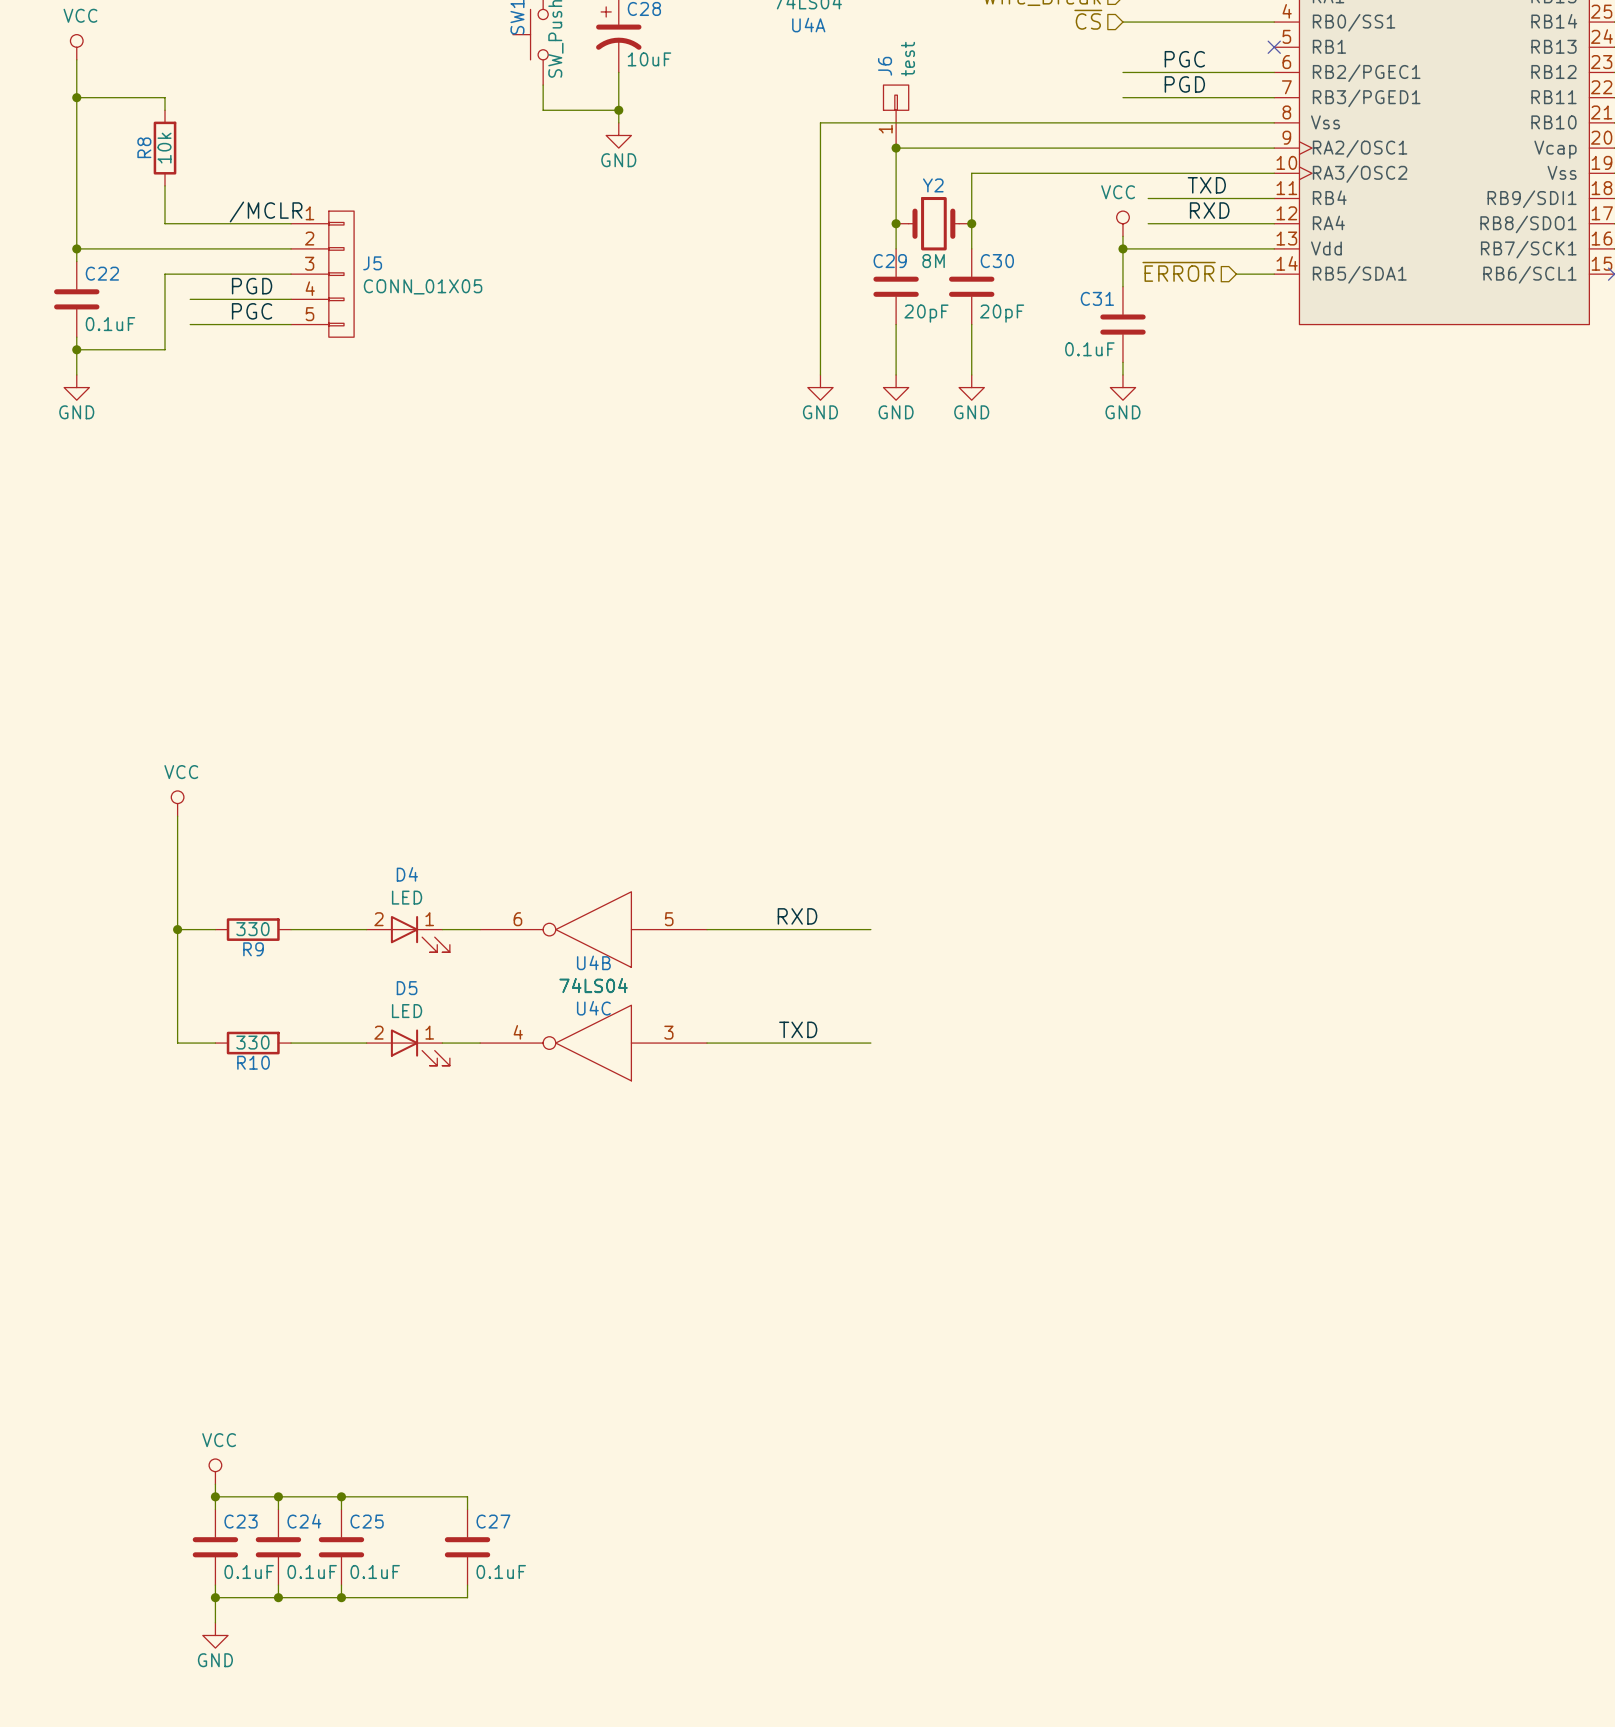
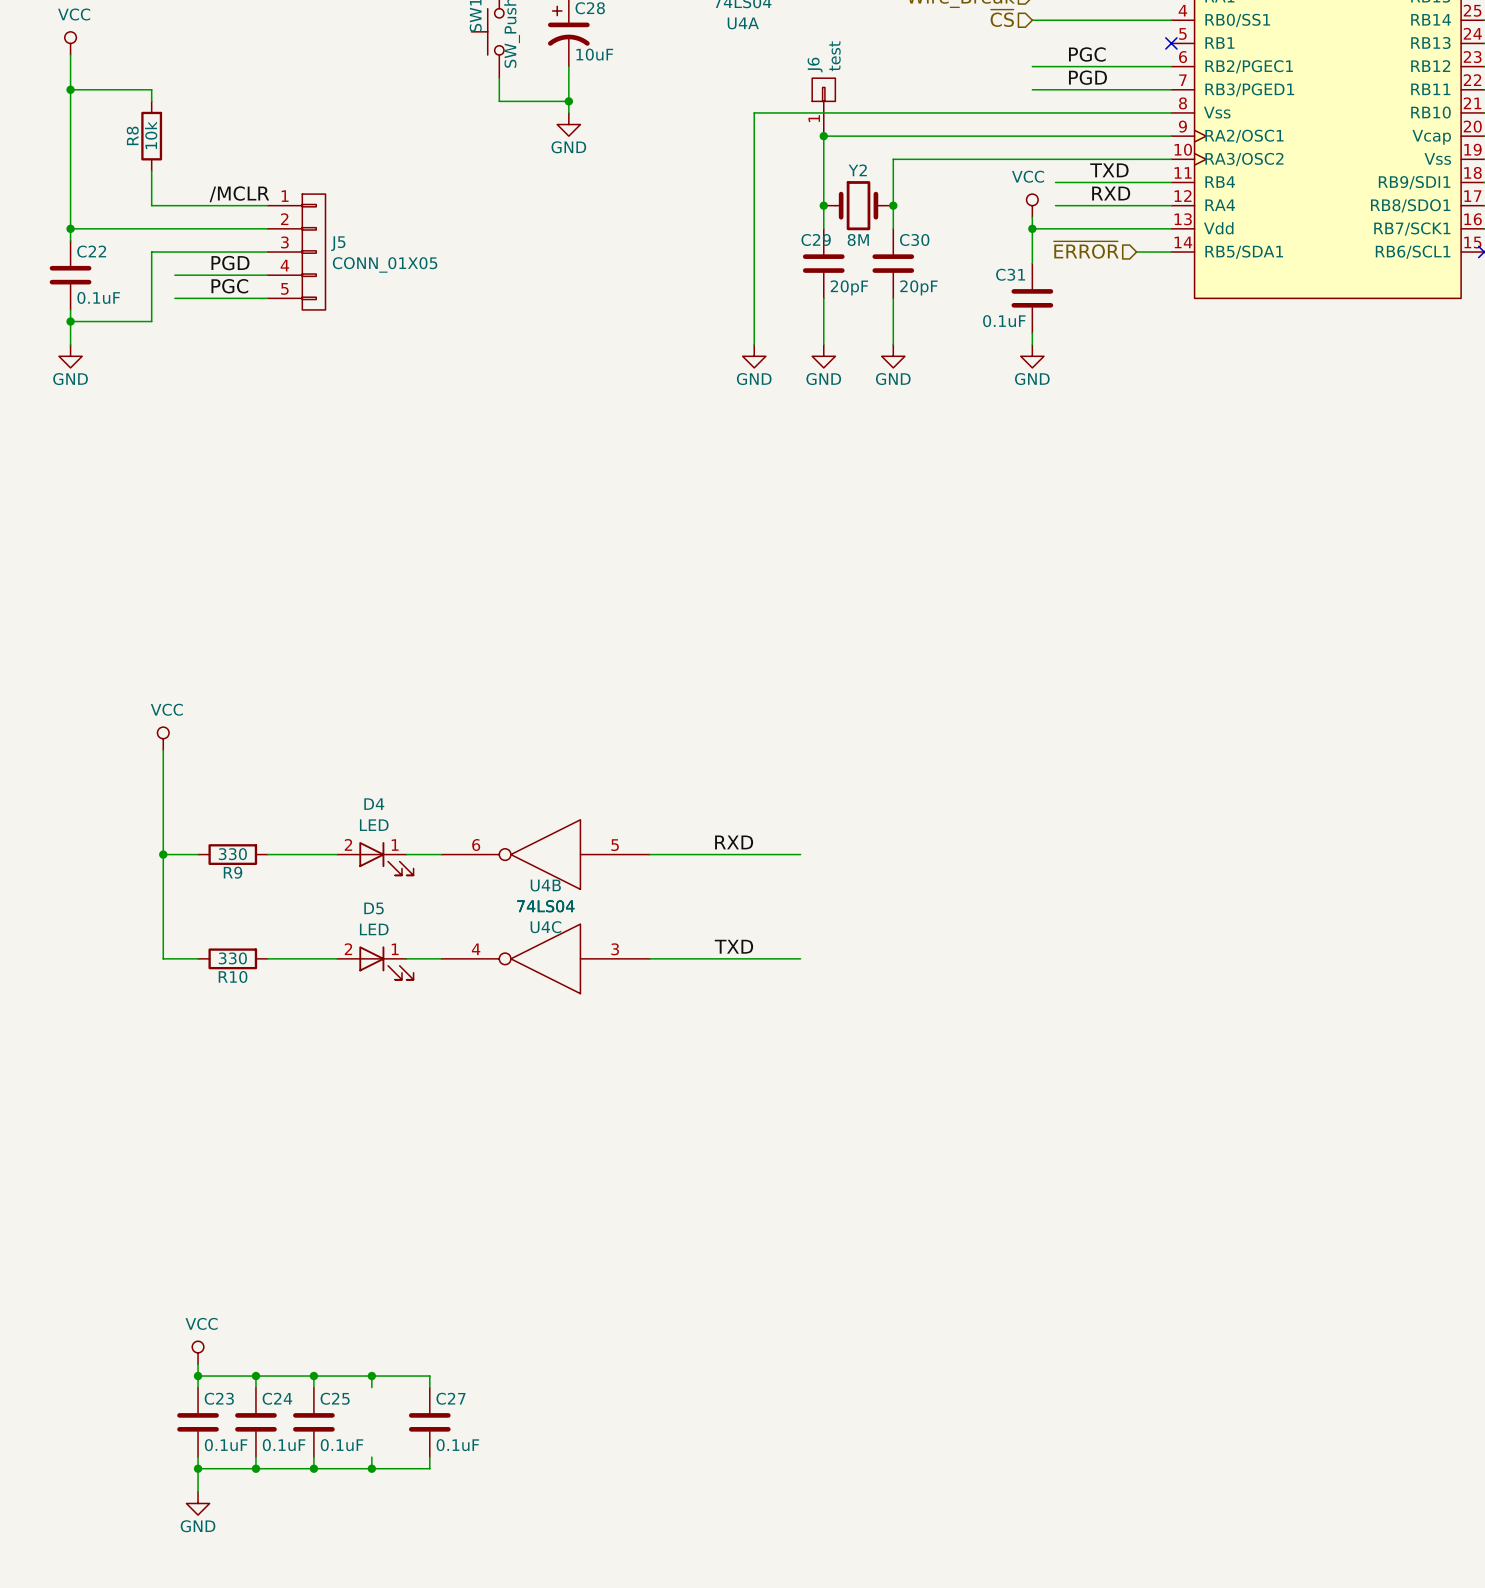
wire: none -> (371, 1376) (371, 1387)
junction: none -> (371, 1376)
wire: none -> (371, 1457) (371, 1468)
junction: none -> (371, 1468)

